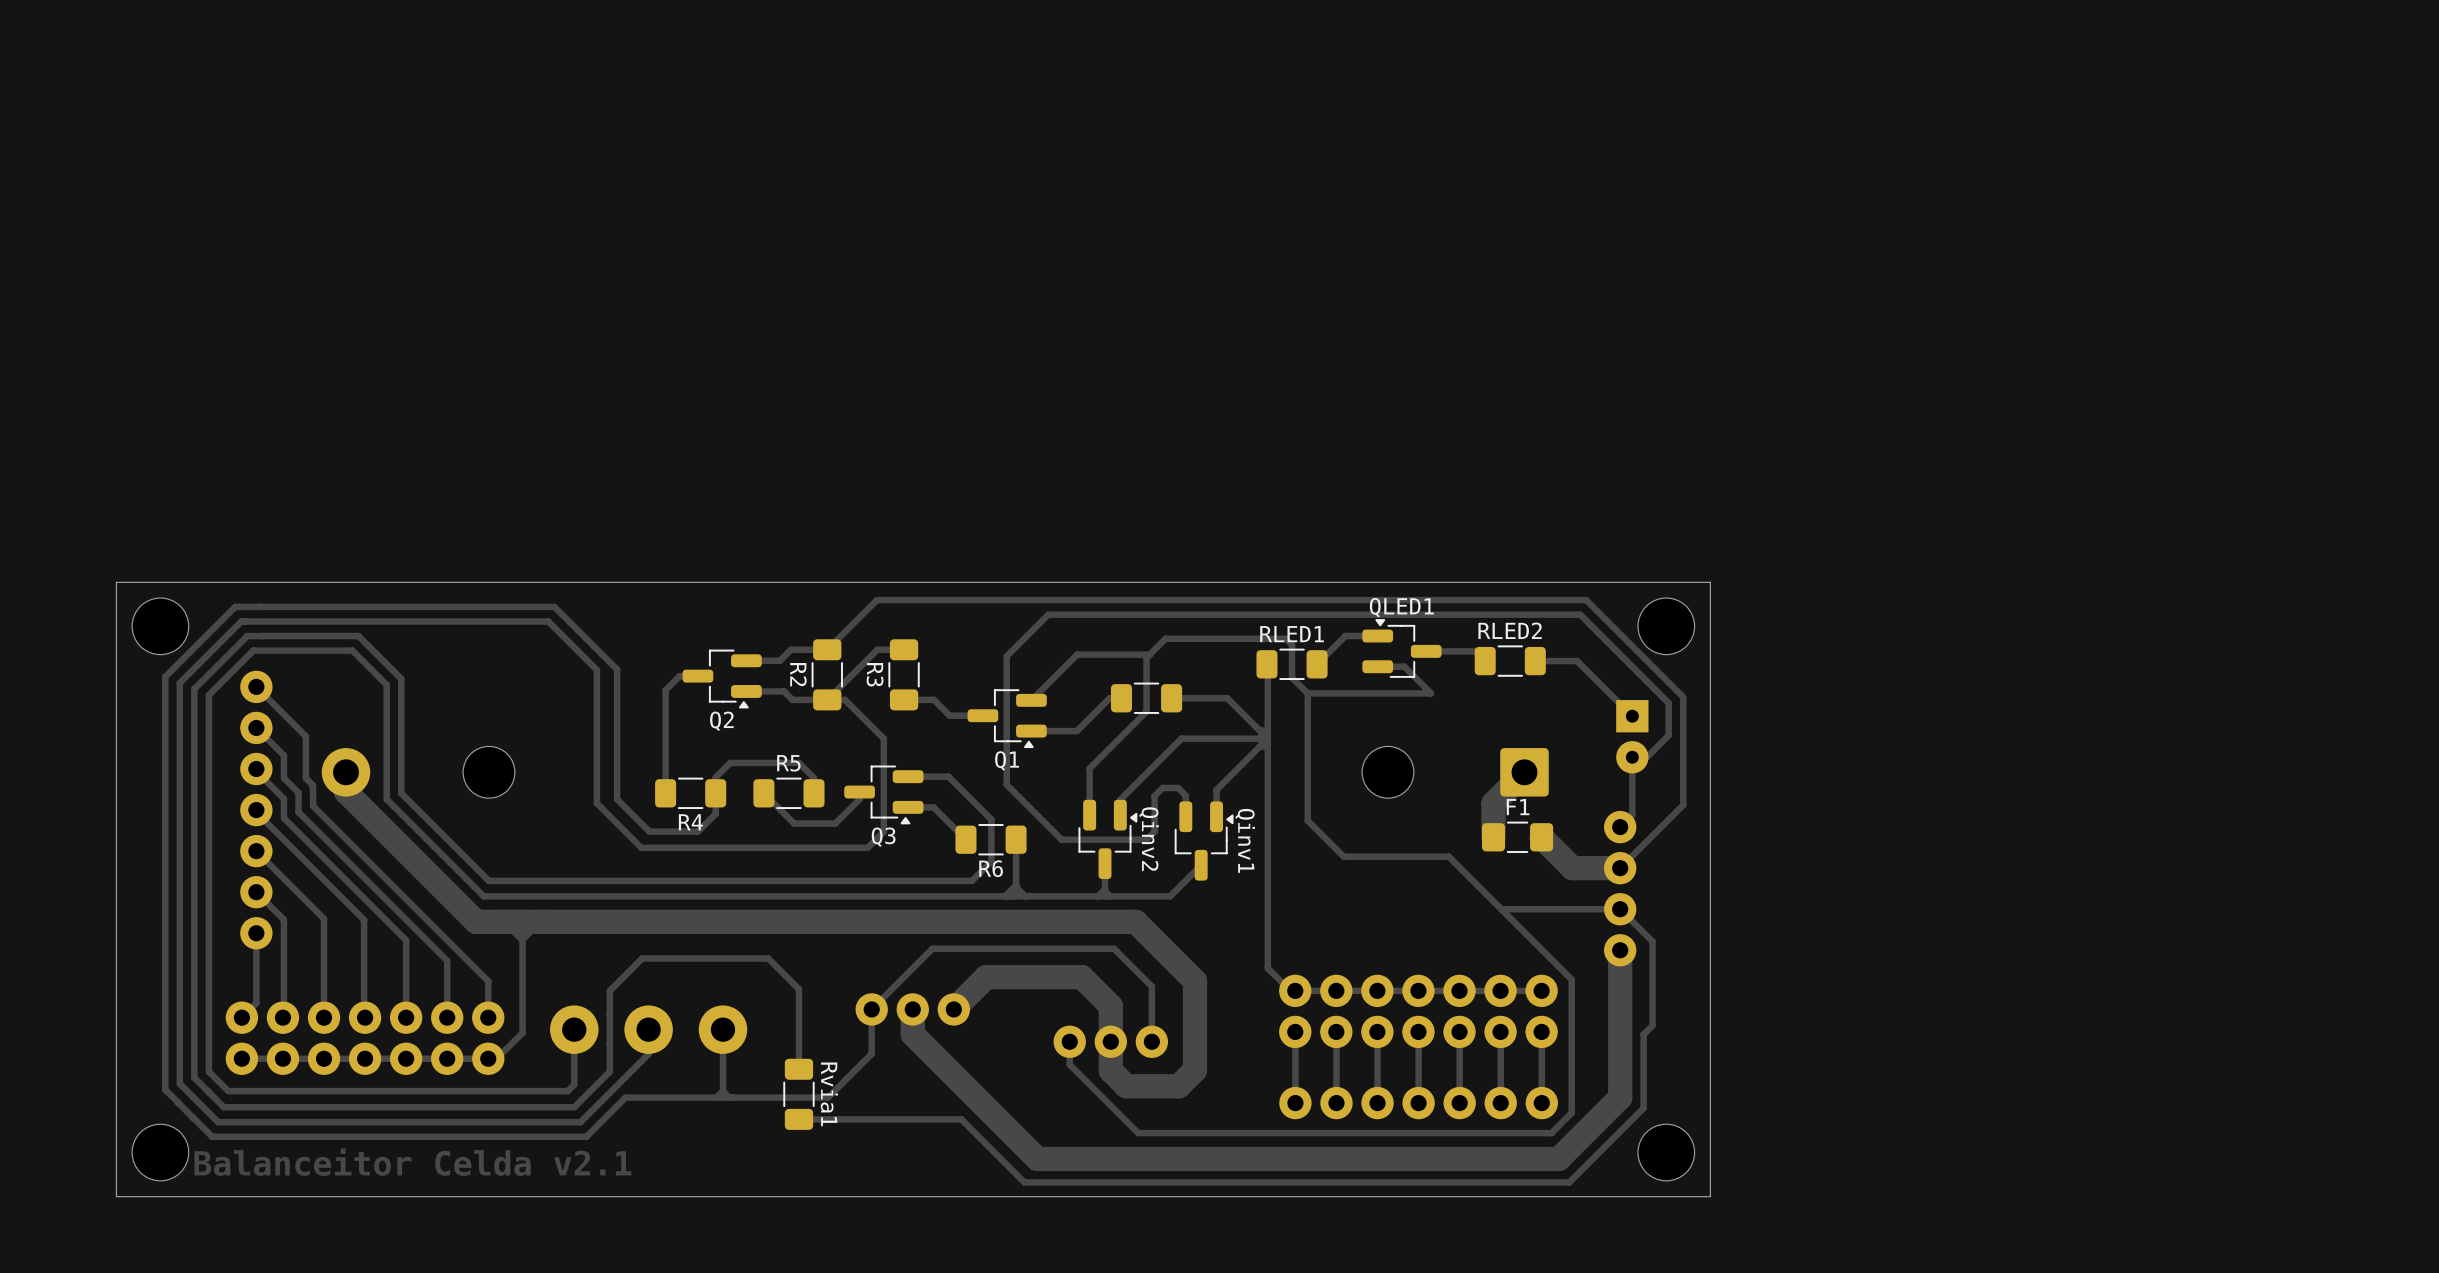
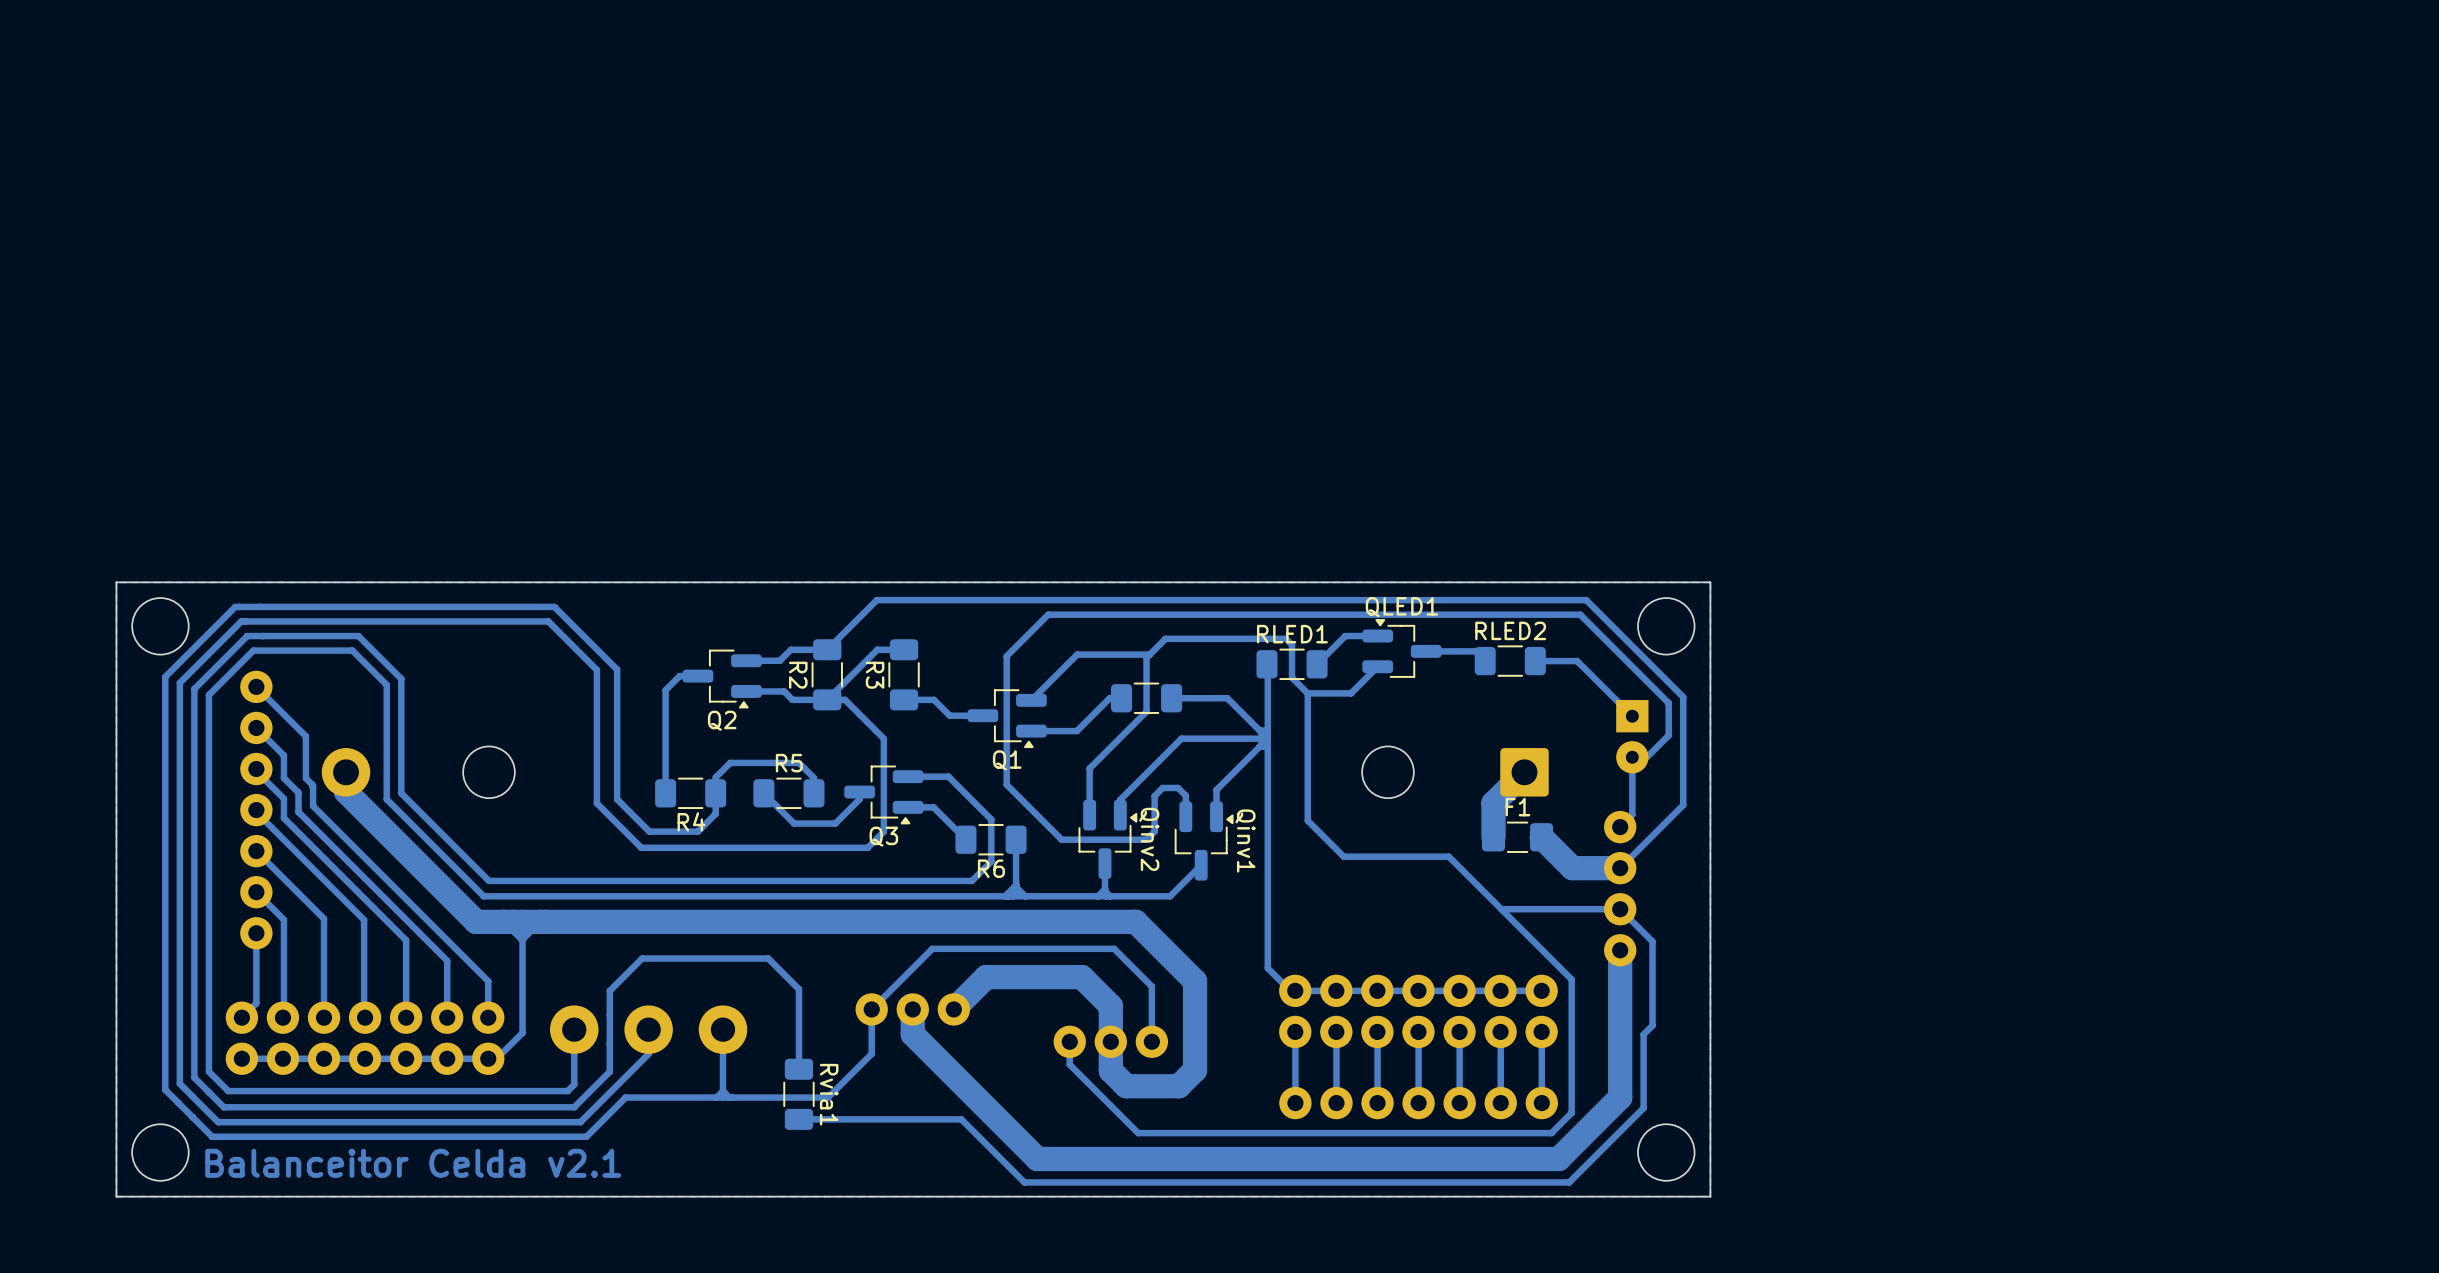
track: (1377, 666) (1404, 666) (1431, 693) (1351, 693) -> (1377, 666) (1351, 693)

